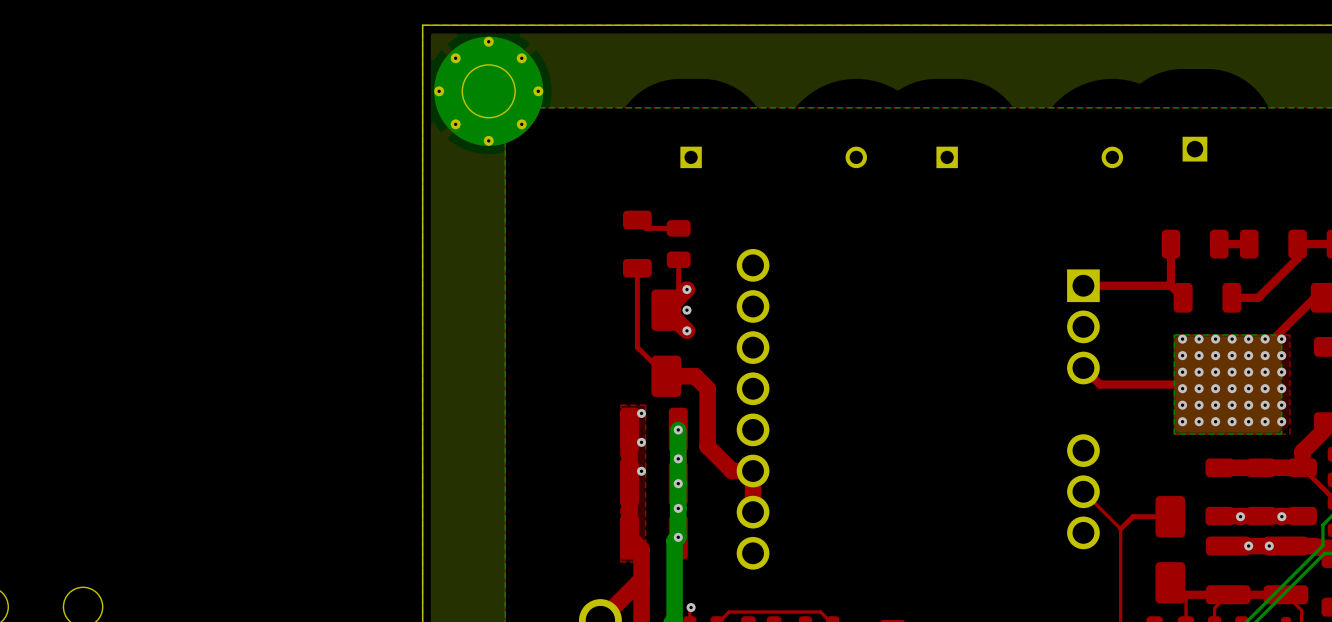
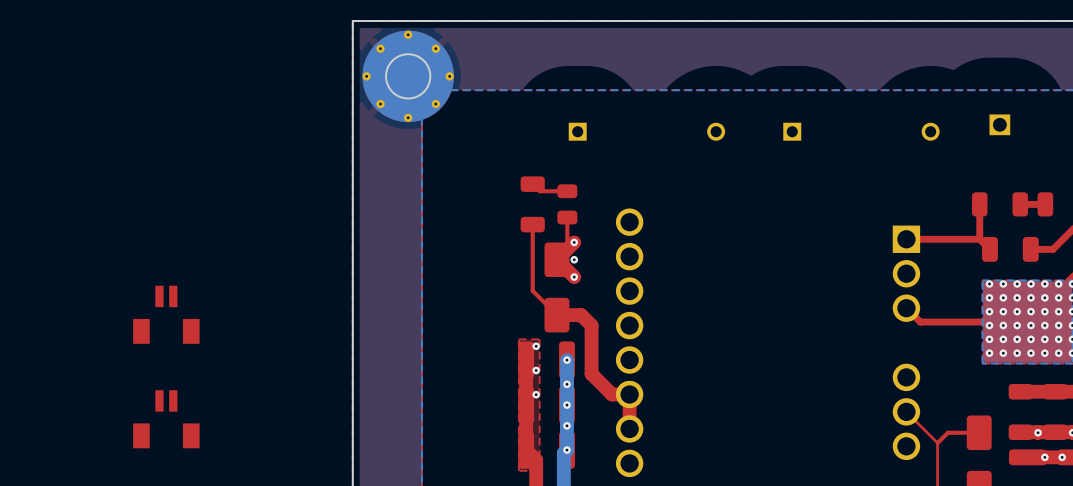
part: none -> (166, 314)
part: none -> (166, 419)

